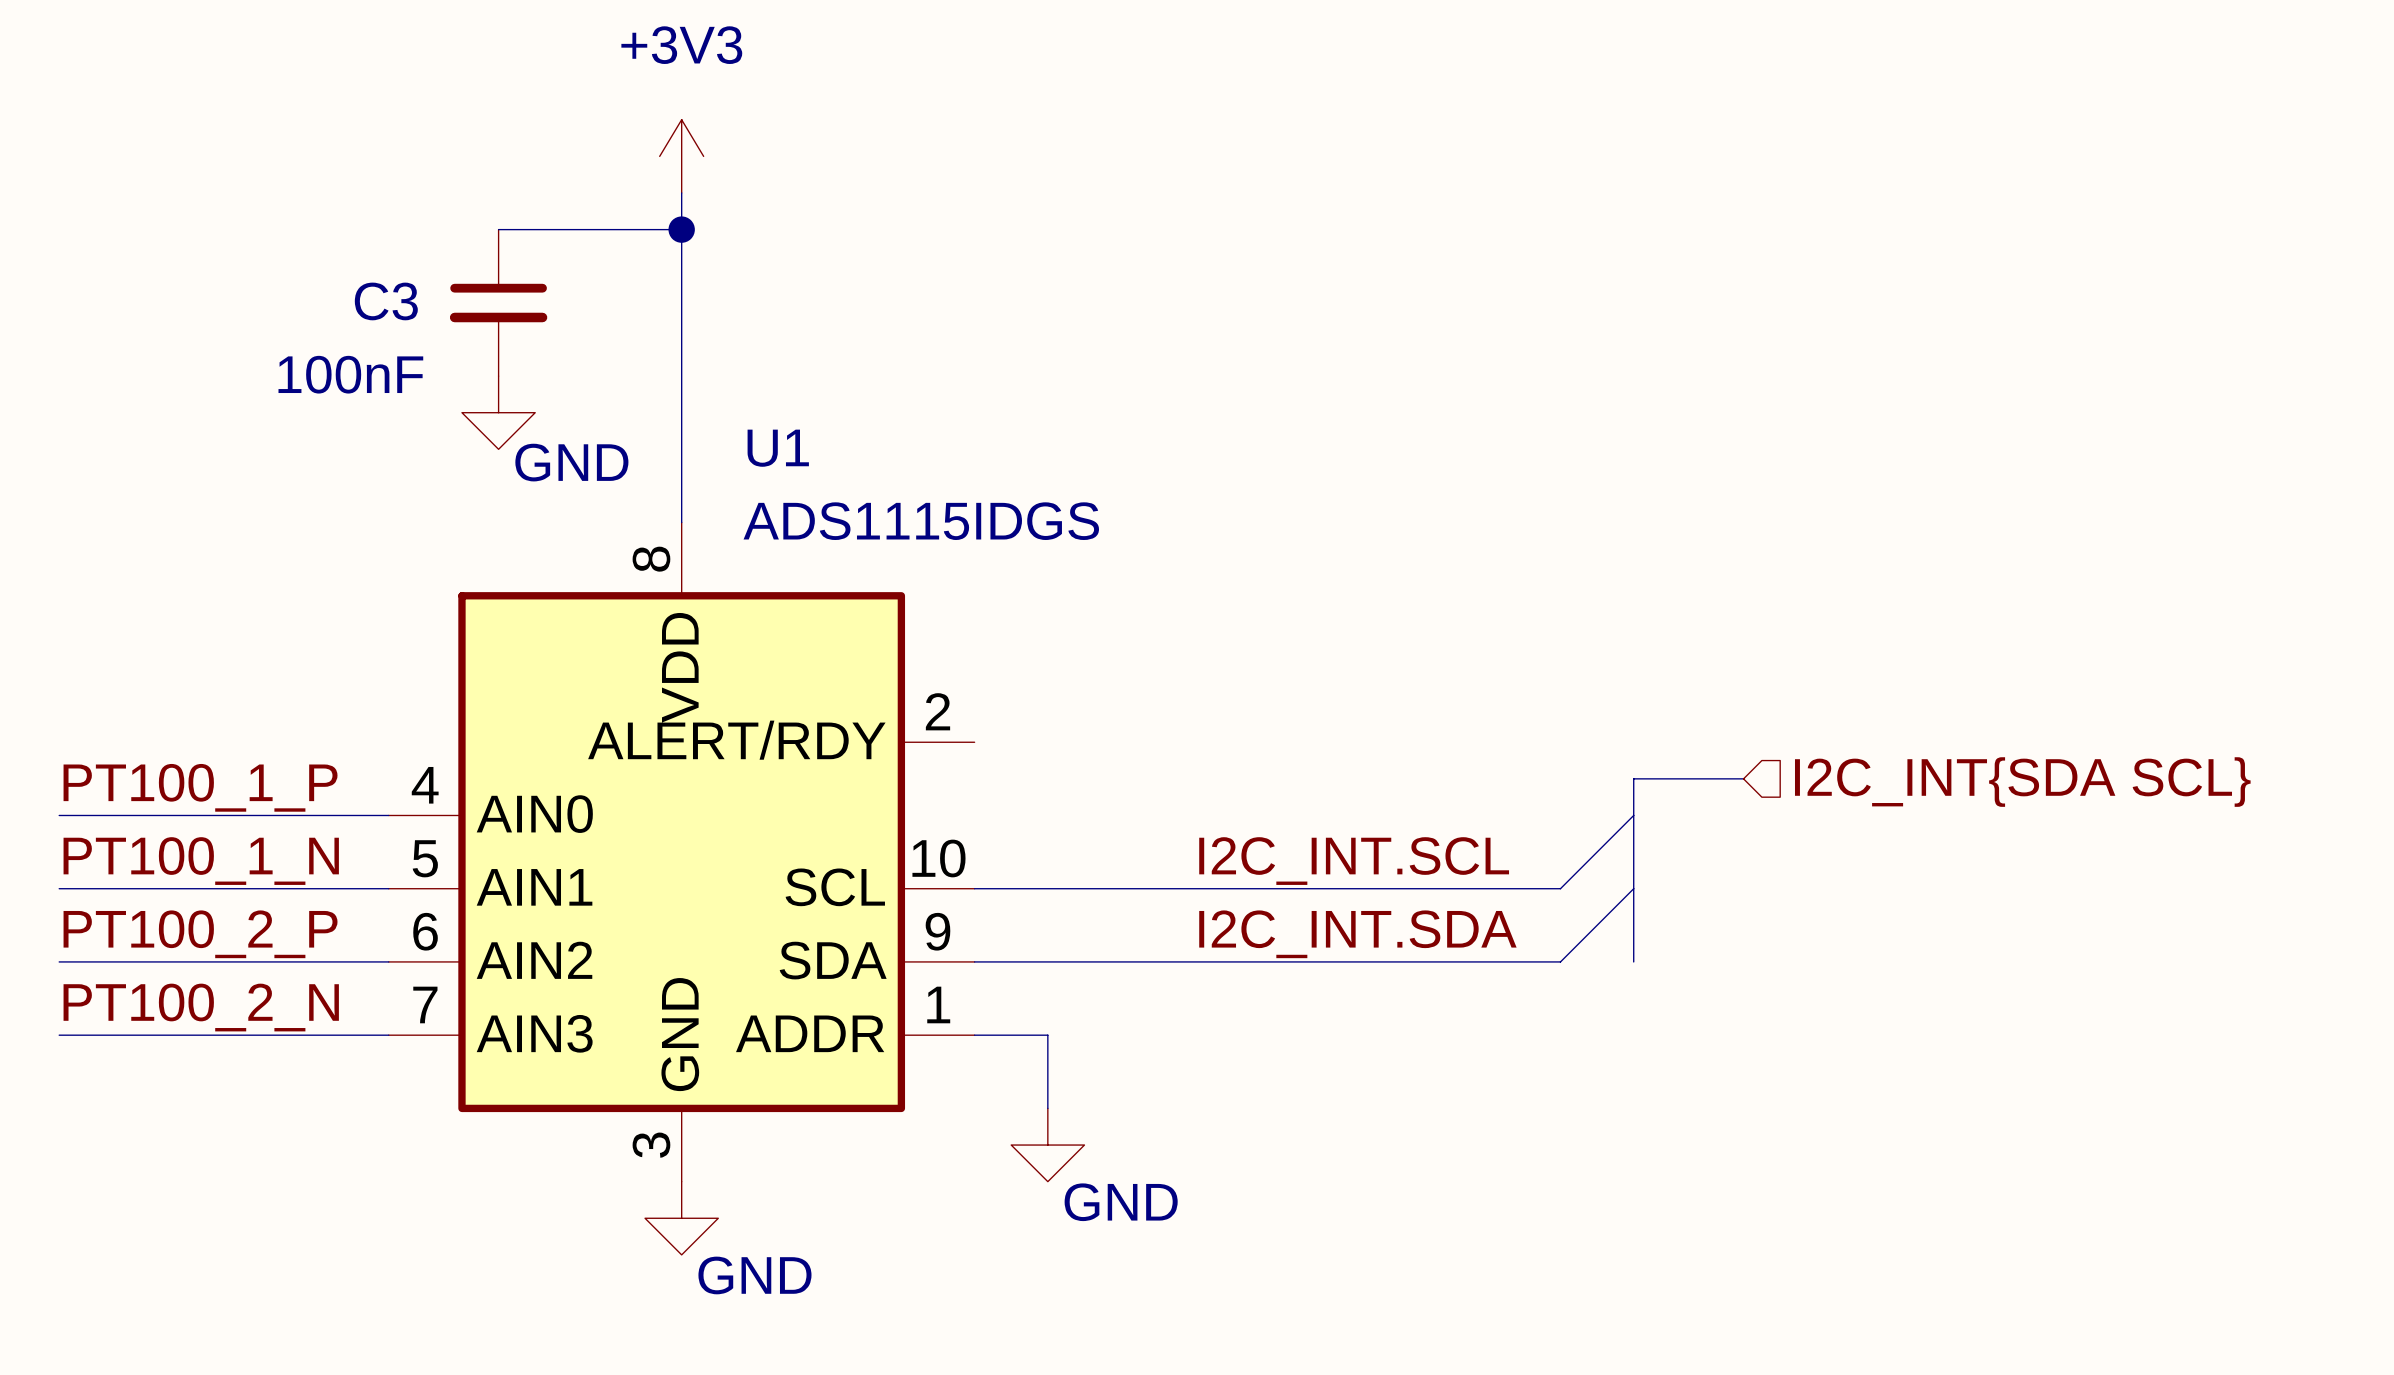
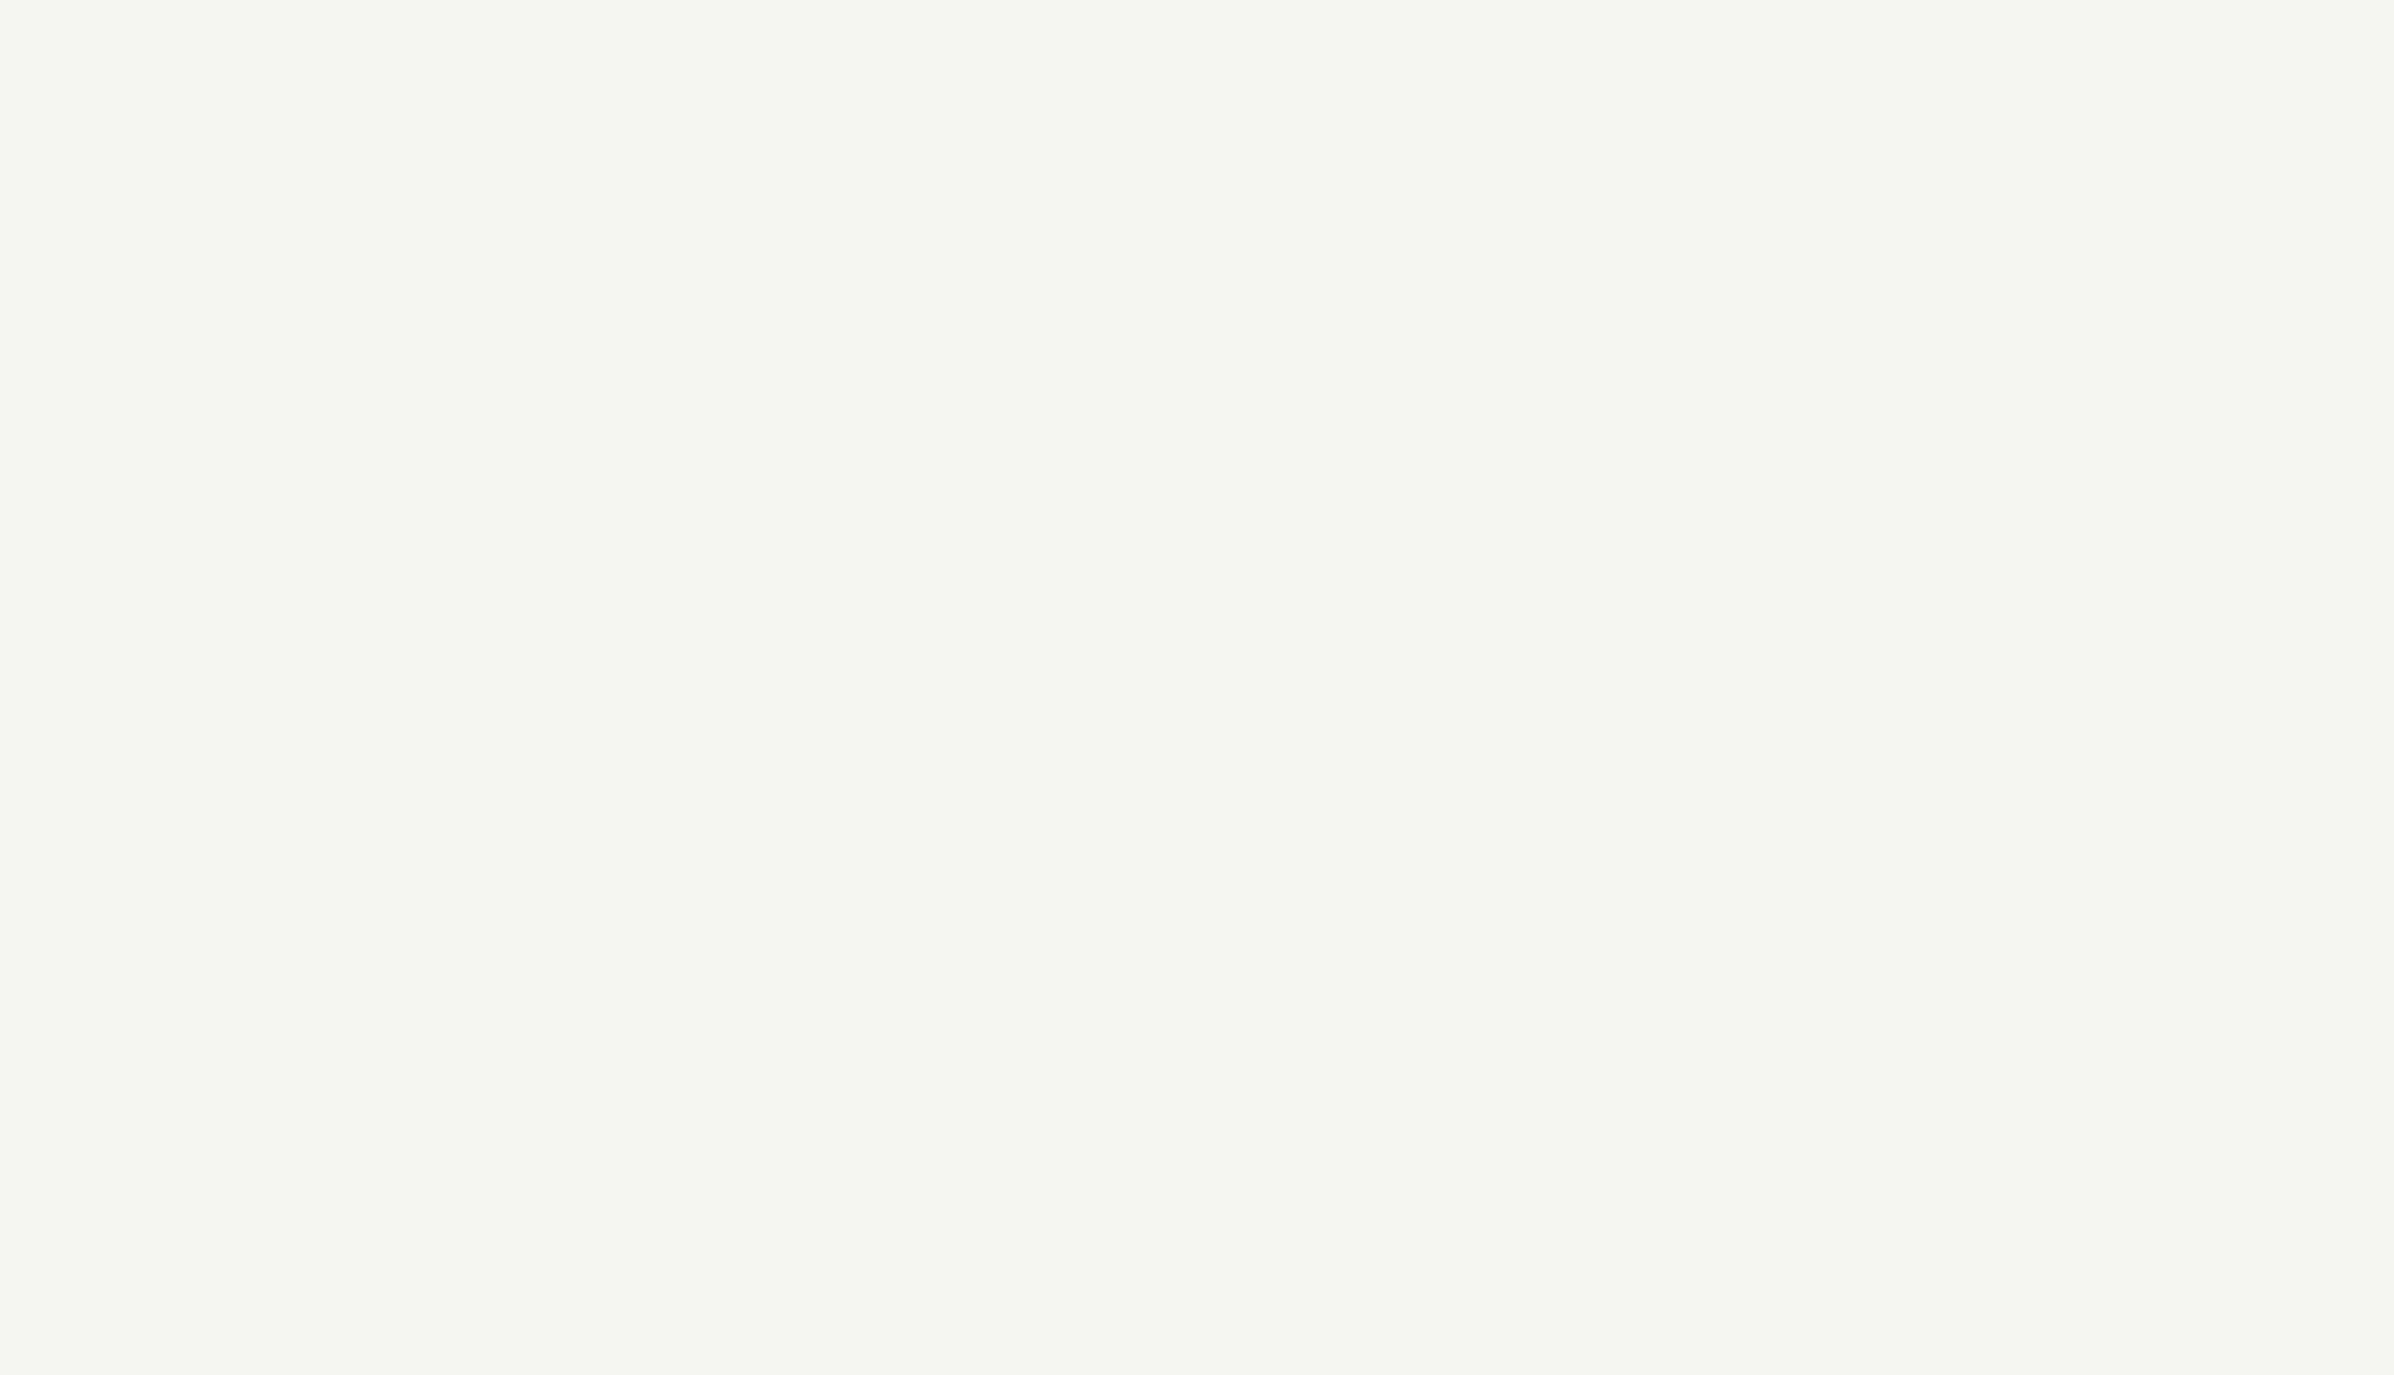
power symbol: +3V3 (681, 156) -> none
wire: (681, 192) (681, 522) -> none
wire: (498, 229) (681, 229) -> none
junction: (681, 229) -> none
C3: 100nF (498, 302) -> none
power symbol: GND (498, 412) -> none
bus: (1743, 778) (1633, 778) (1633, 961) -> none
hierarchical label: I2C_INT{SDA SCL} (2022, 782) -> none
label: PT100_1_P (200, 787) -> none
wire: (59, 815) (388, 815) -> none
wire: (1633, 815) (1560, 888) (974, 888) -> none
U1: ADS1115IDGS (681, 852) -> none
label: PT100_1_N (201, 861) -> none
label: I2C_INT.SCL (1354, 861) -> none
wire: (59, 888) (388, 888) -> none
wire: (1633, 888) (1560, 961) (974, 961) -> none
label: PT100_2_P (200, 934) -> none
label: I2C_INT.SDA (1357, 934) -> none
wire: (59, 961) (388, 961) -> none
label: PT100_2_N (201, 1007) -> none
wire: (59, 1035) (388, 1035) -> none
wire: (974, 1035) (1047, 1035) (1047, 1108) -> none
power symbol: GND (1047, 1145) -> none
power symbol: GND (681, 1218) -> none

